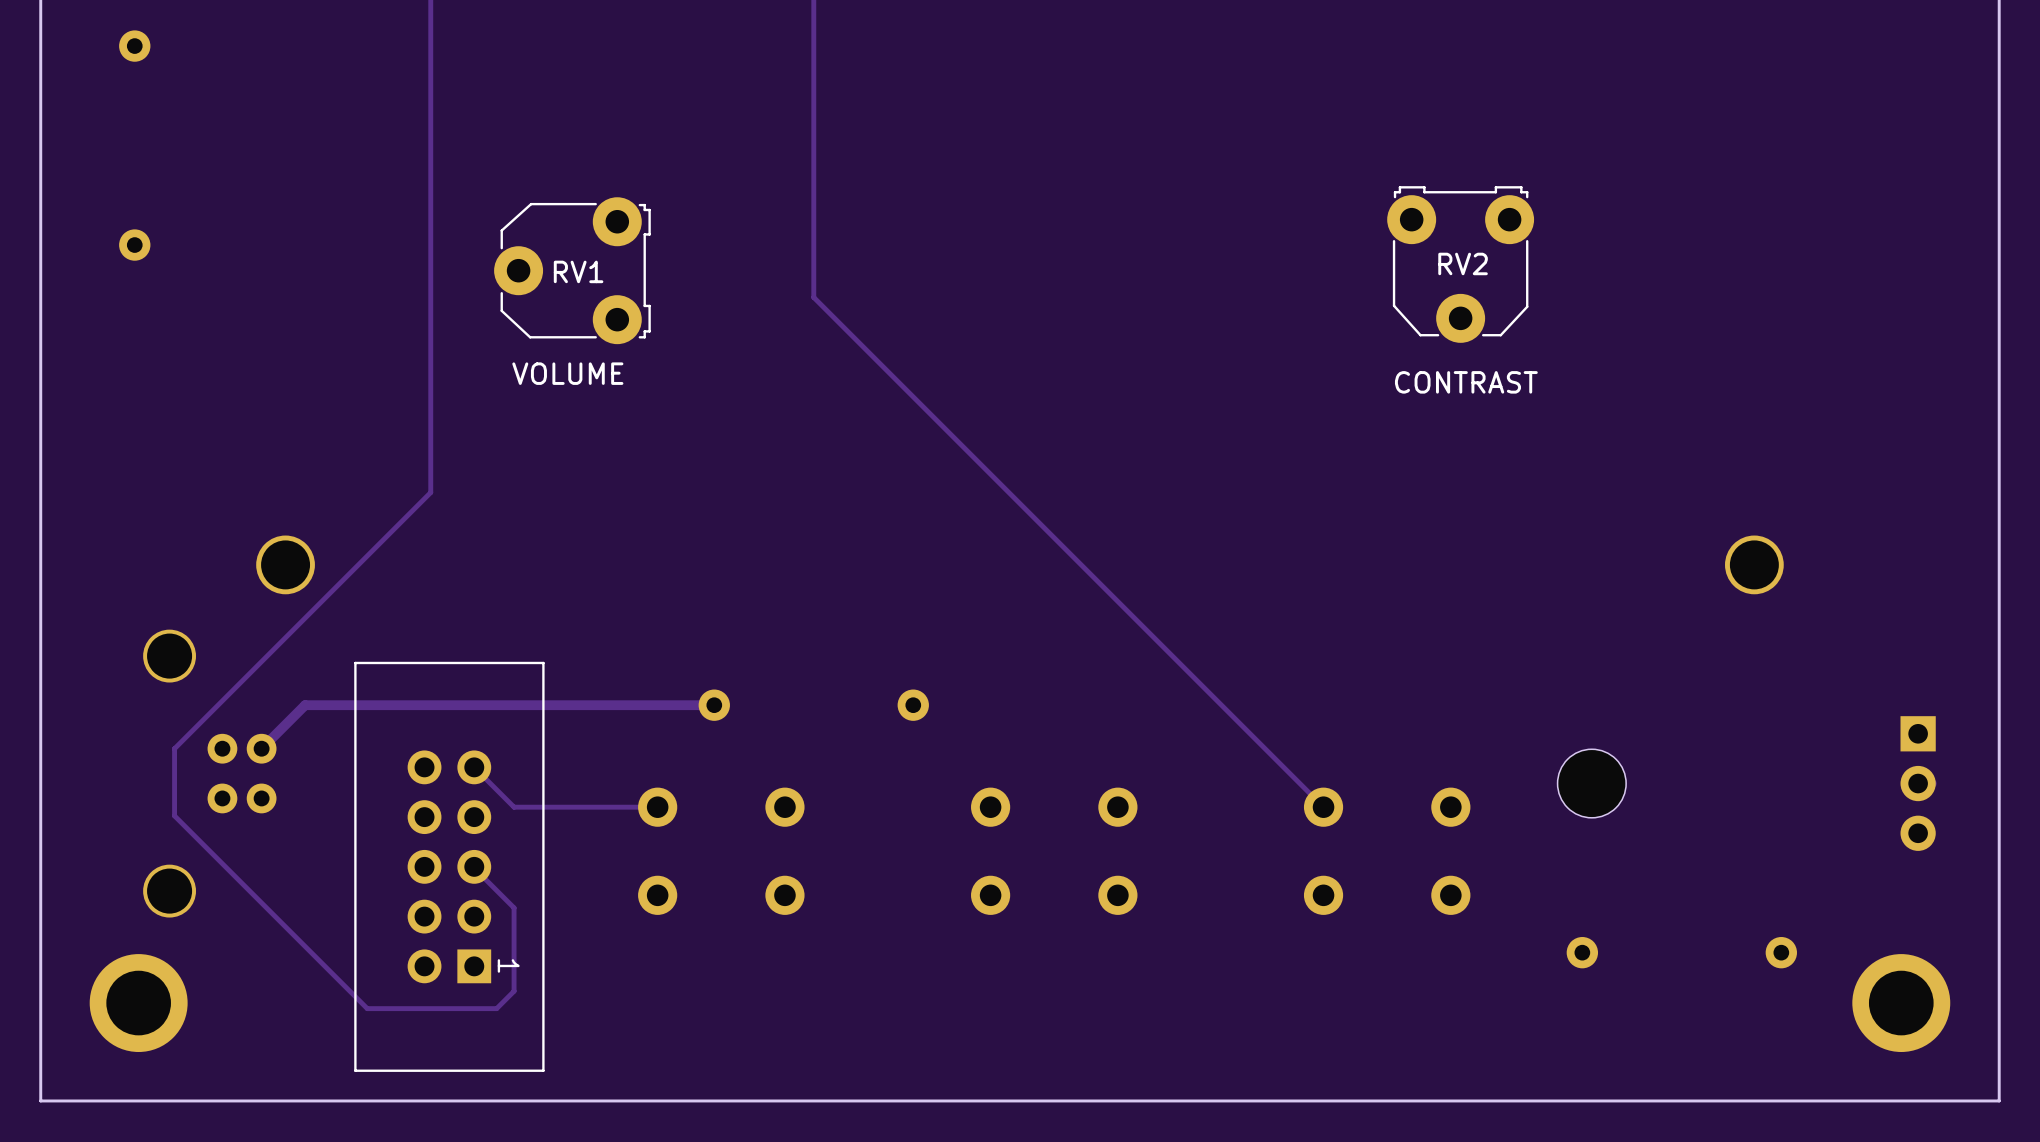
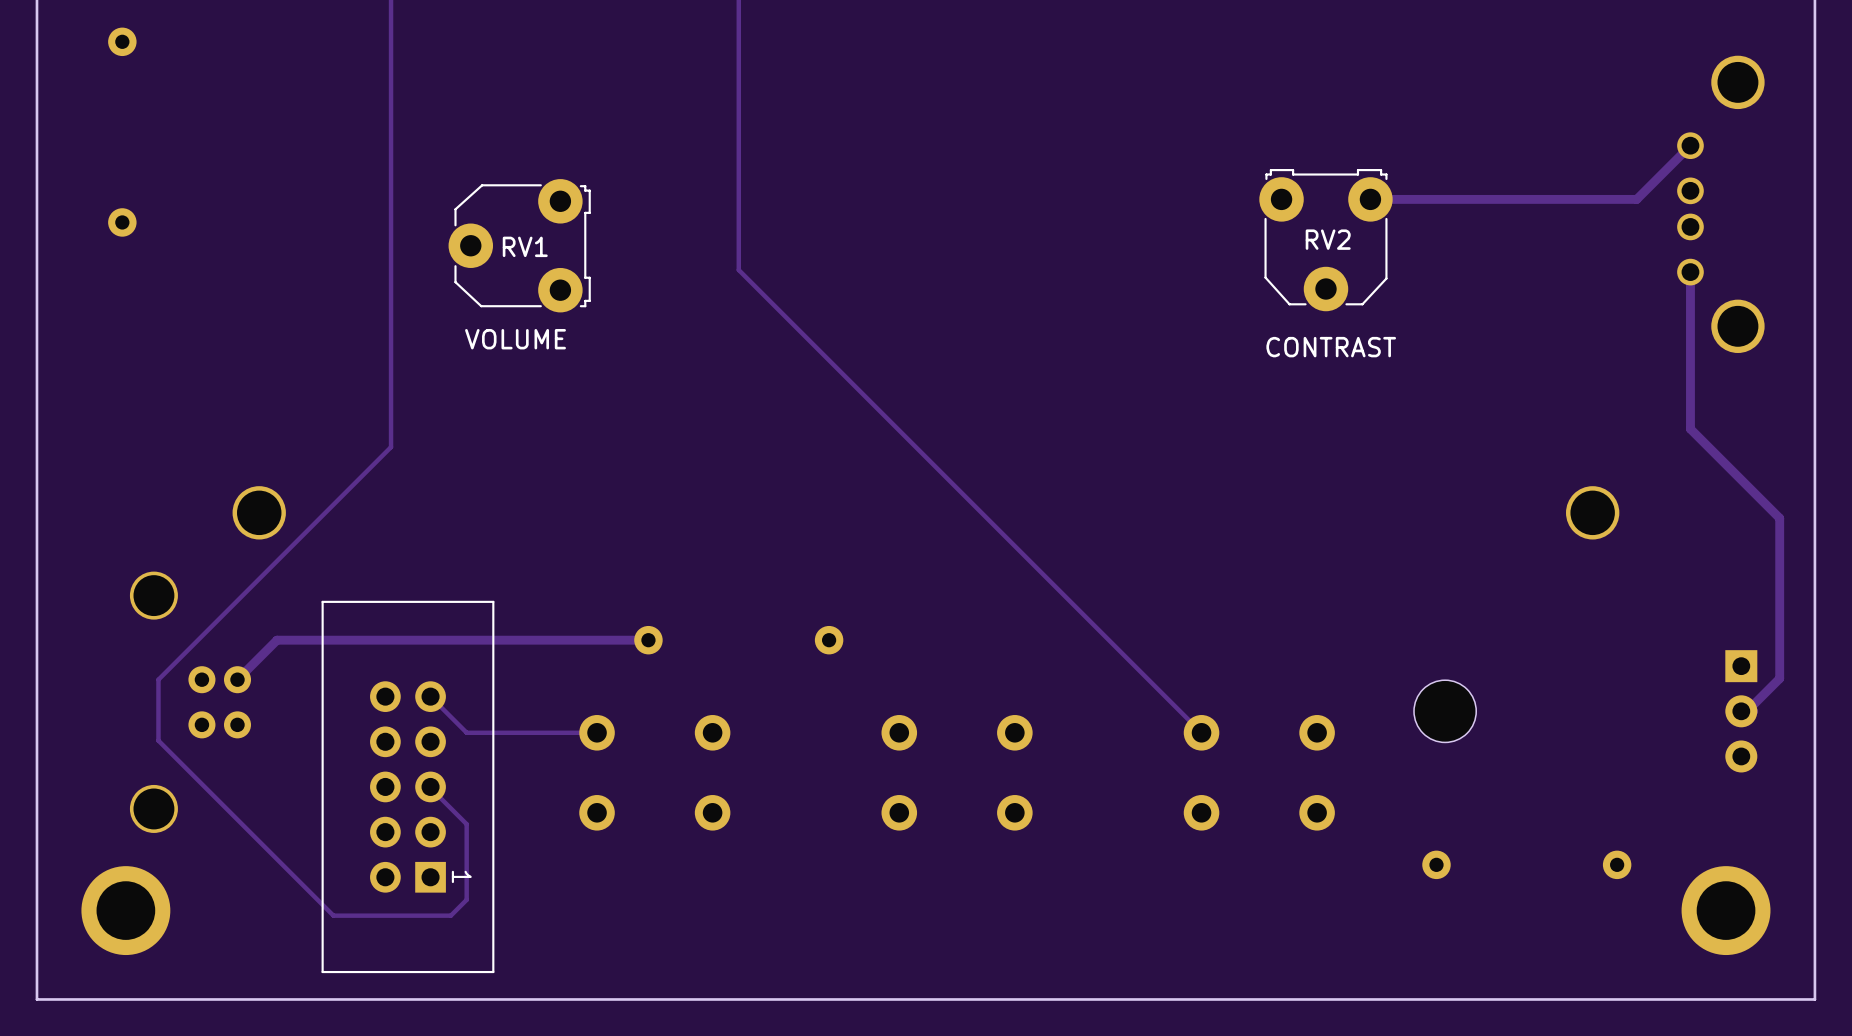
track: none -> (1690, 145) (1636, 199) (1370, 199)
part: none -> (1720, 204)
track: none -> (1690, 272) (1690, 429) (1779, 518) (1779, 678) (1746, 711)

